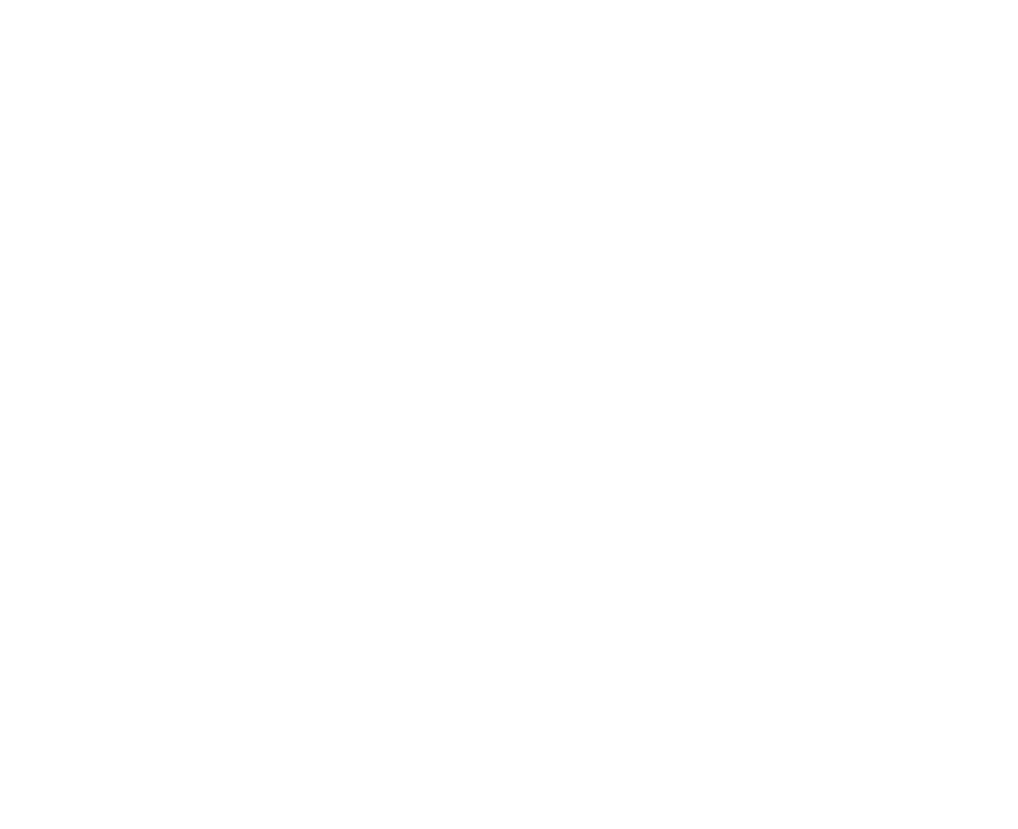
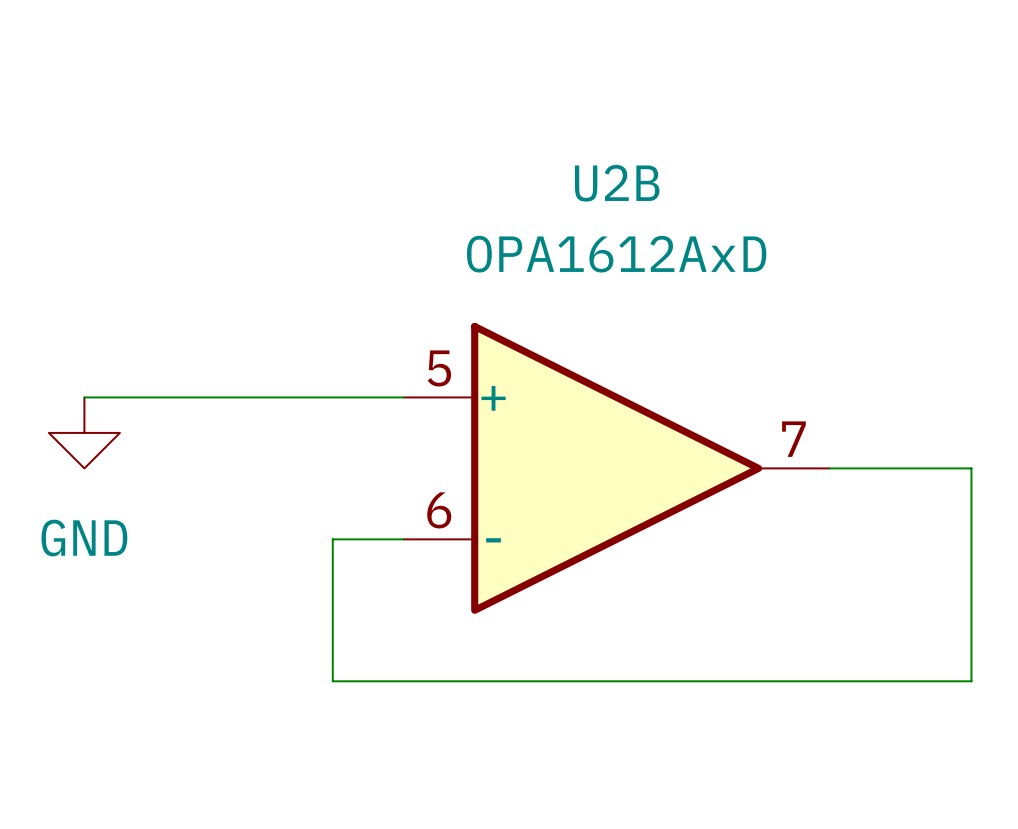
wire: none -> (84, 397) (403, 397)
power symbol: none -> GND (84, 432)
U2B: none -> OPA1612AxD (616, 468)
wire: none -> (829, 468) (971, 468) (971, 681) (332, 681) (332, 539) (403, 539)

